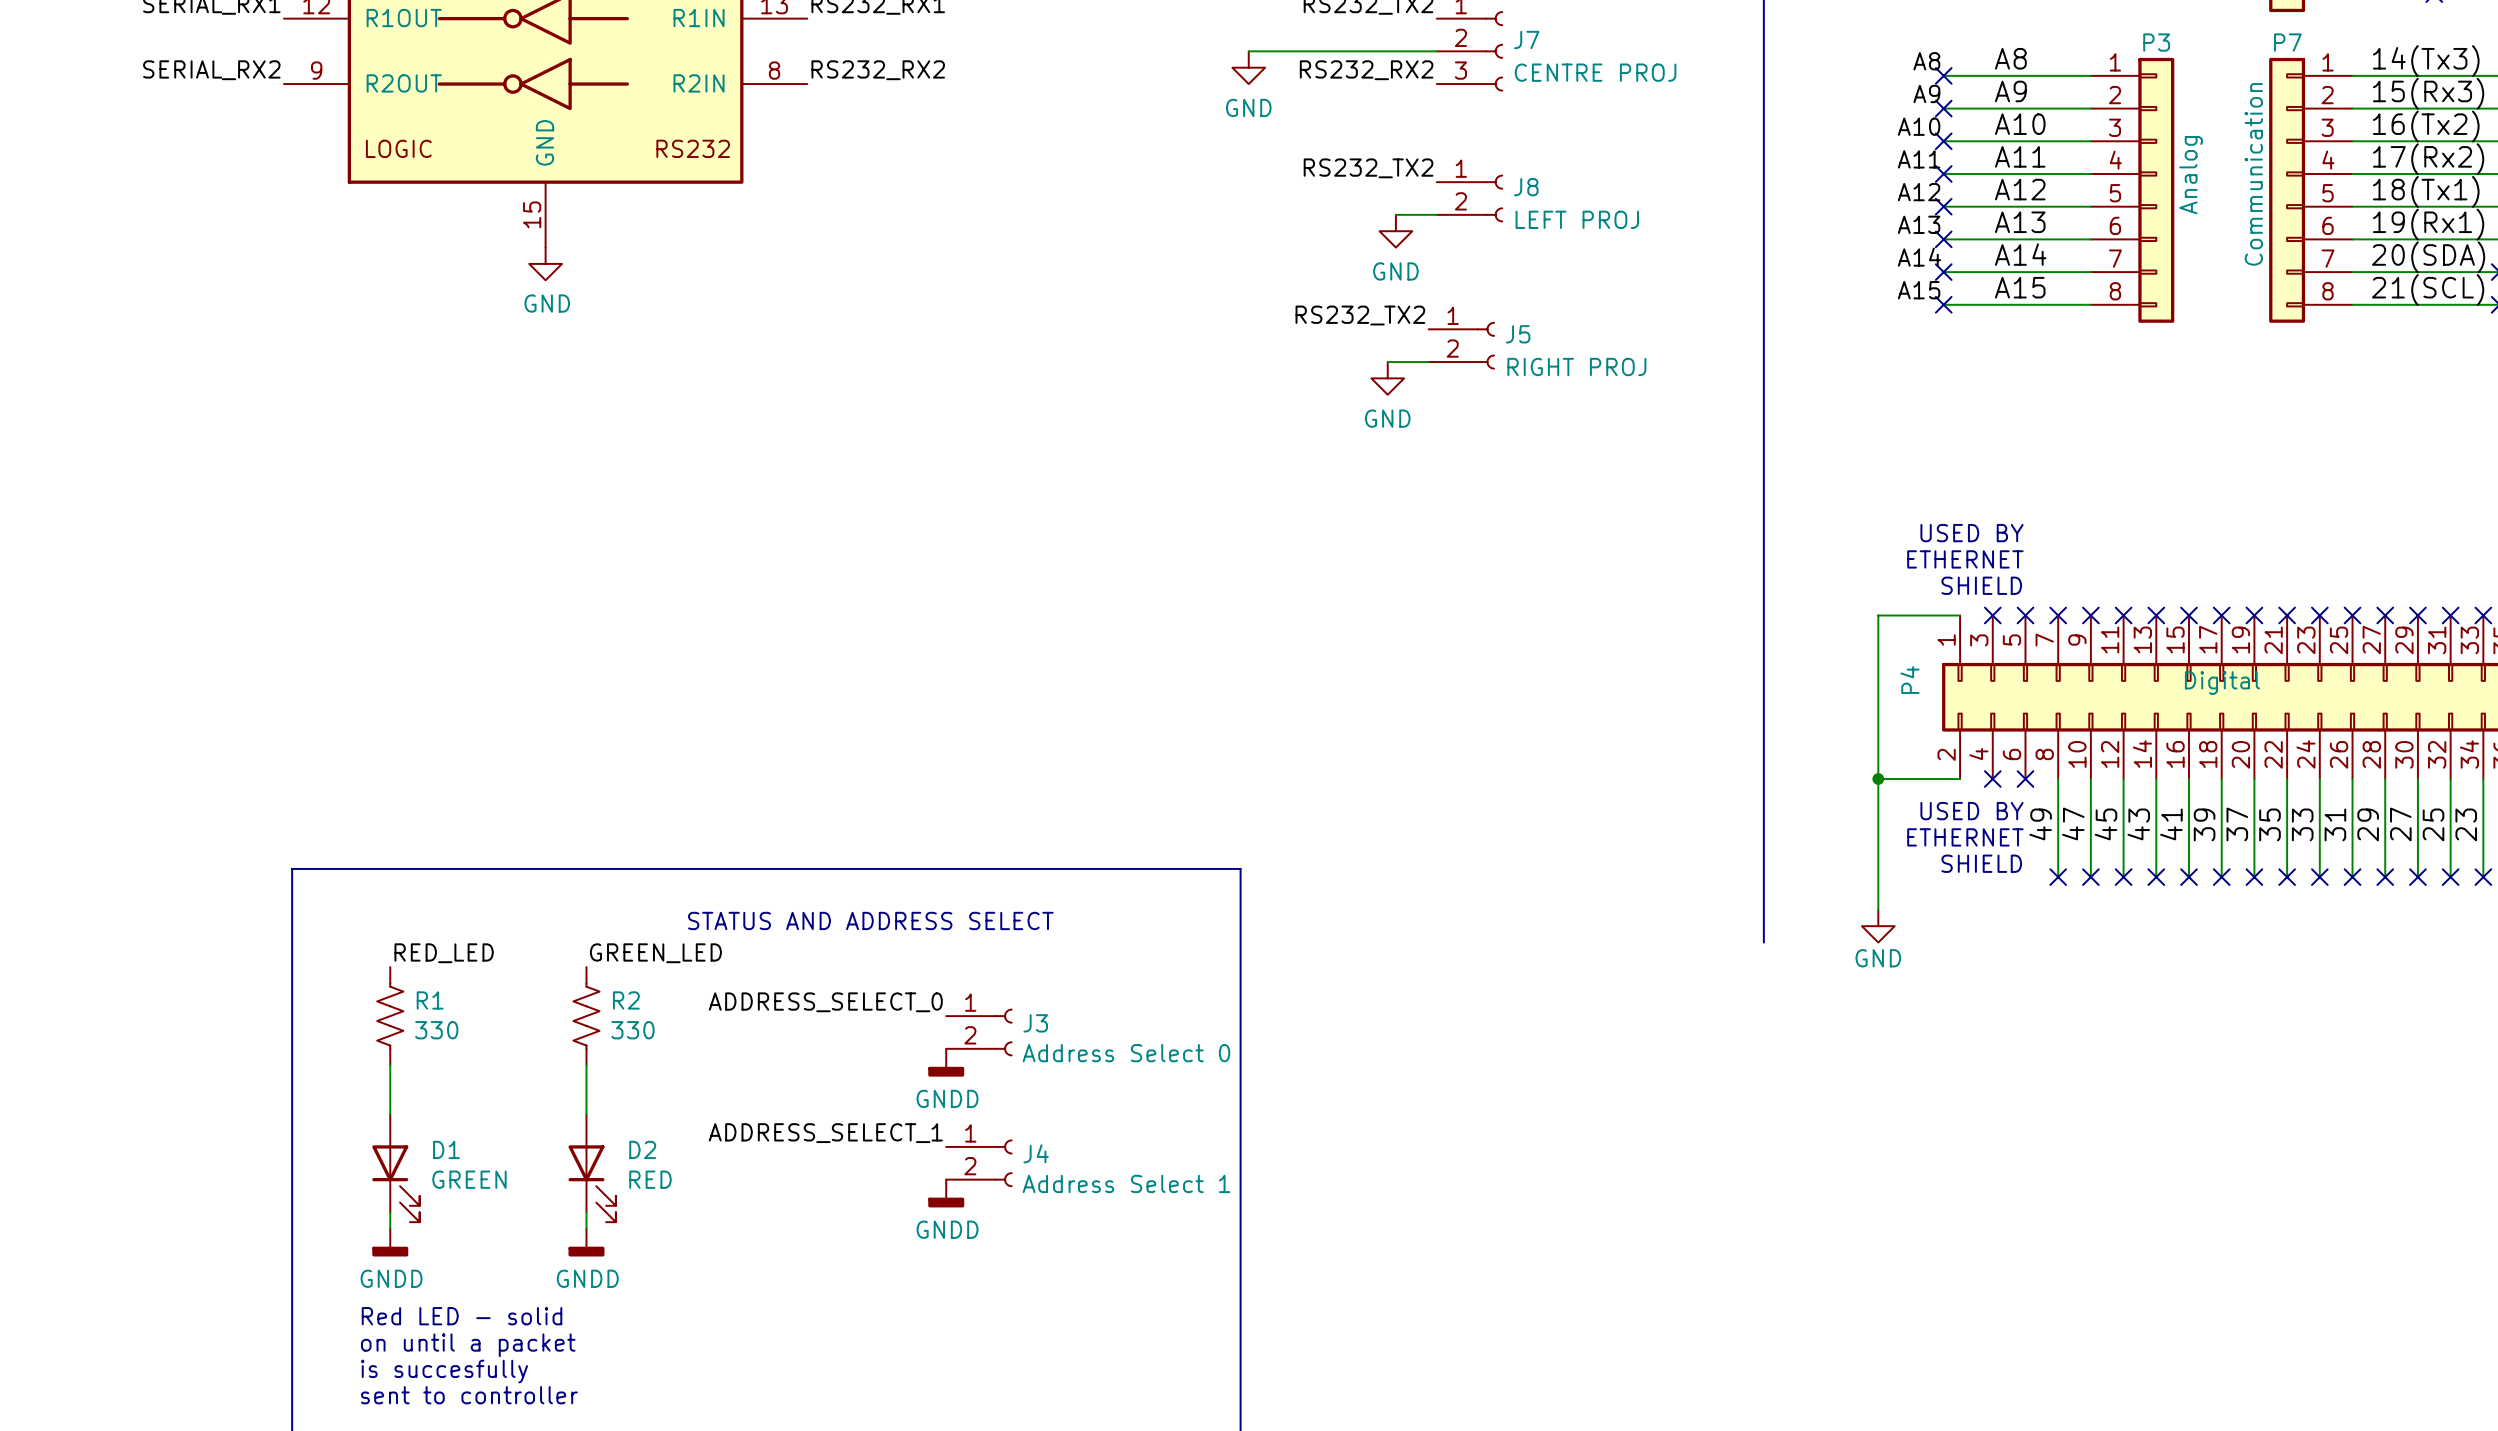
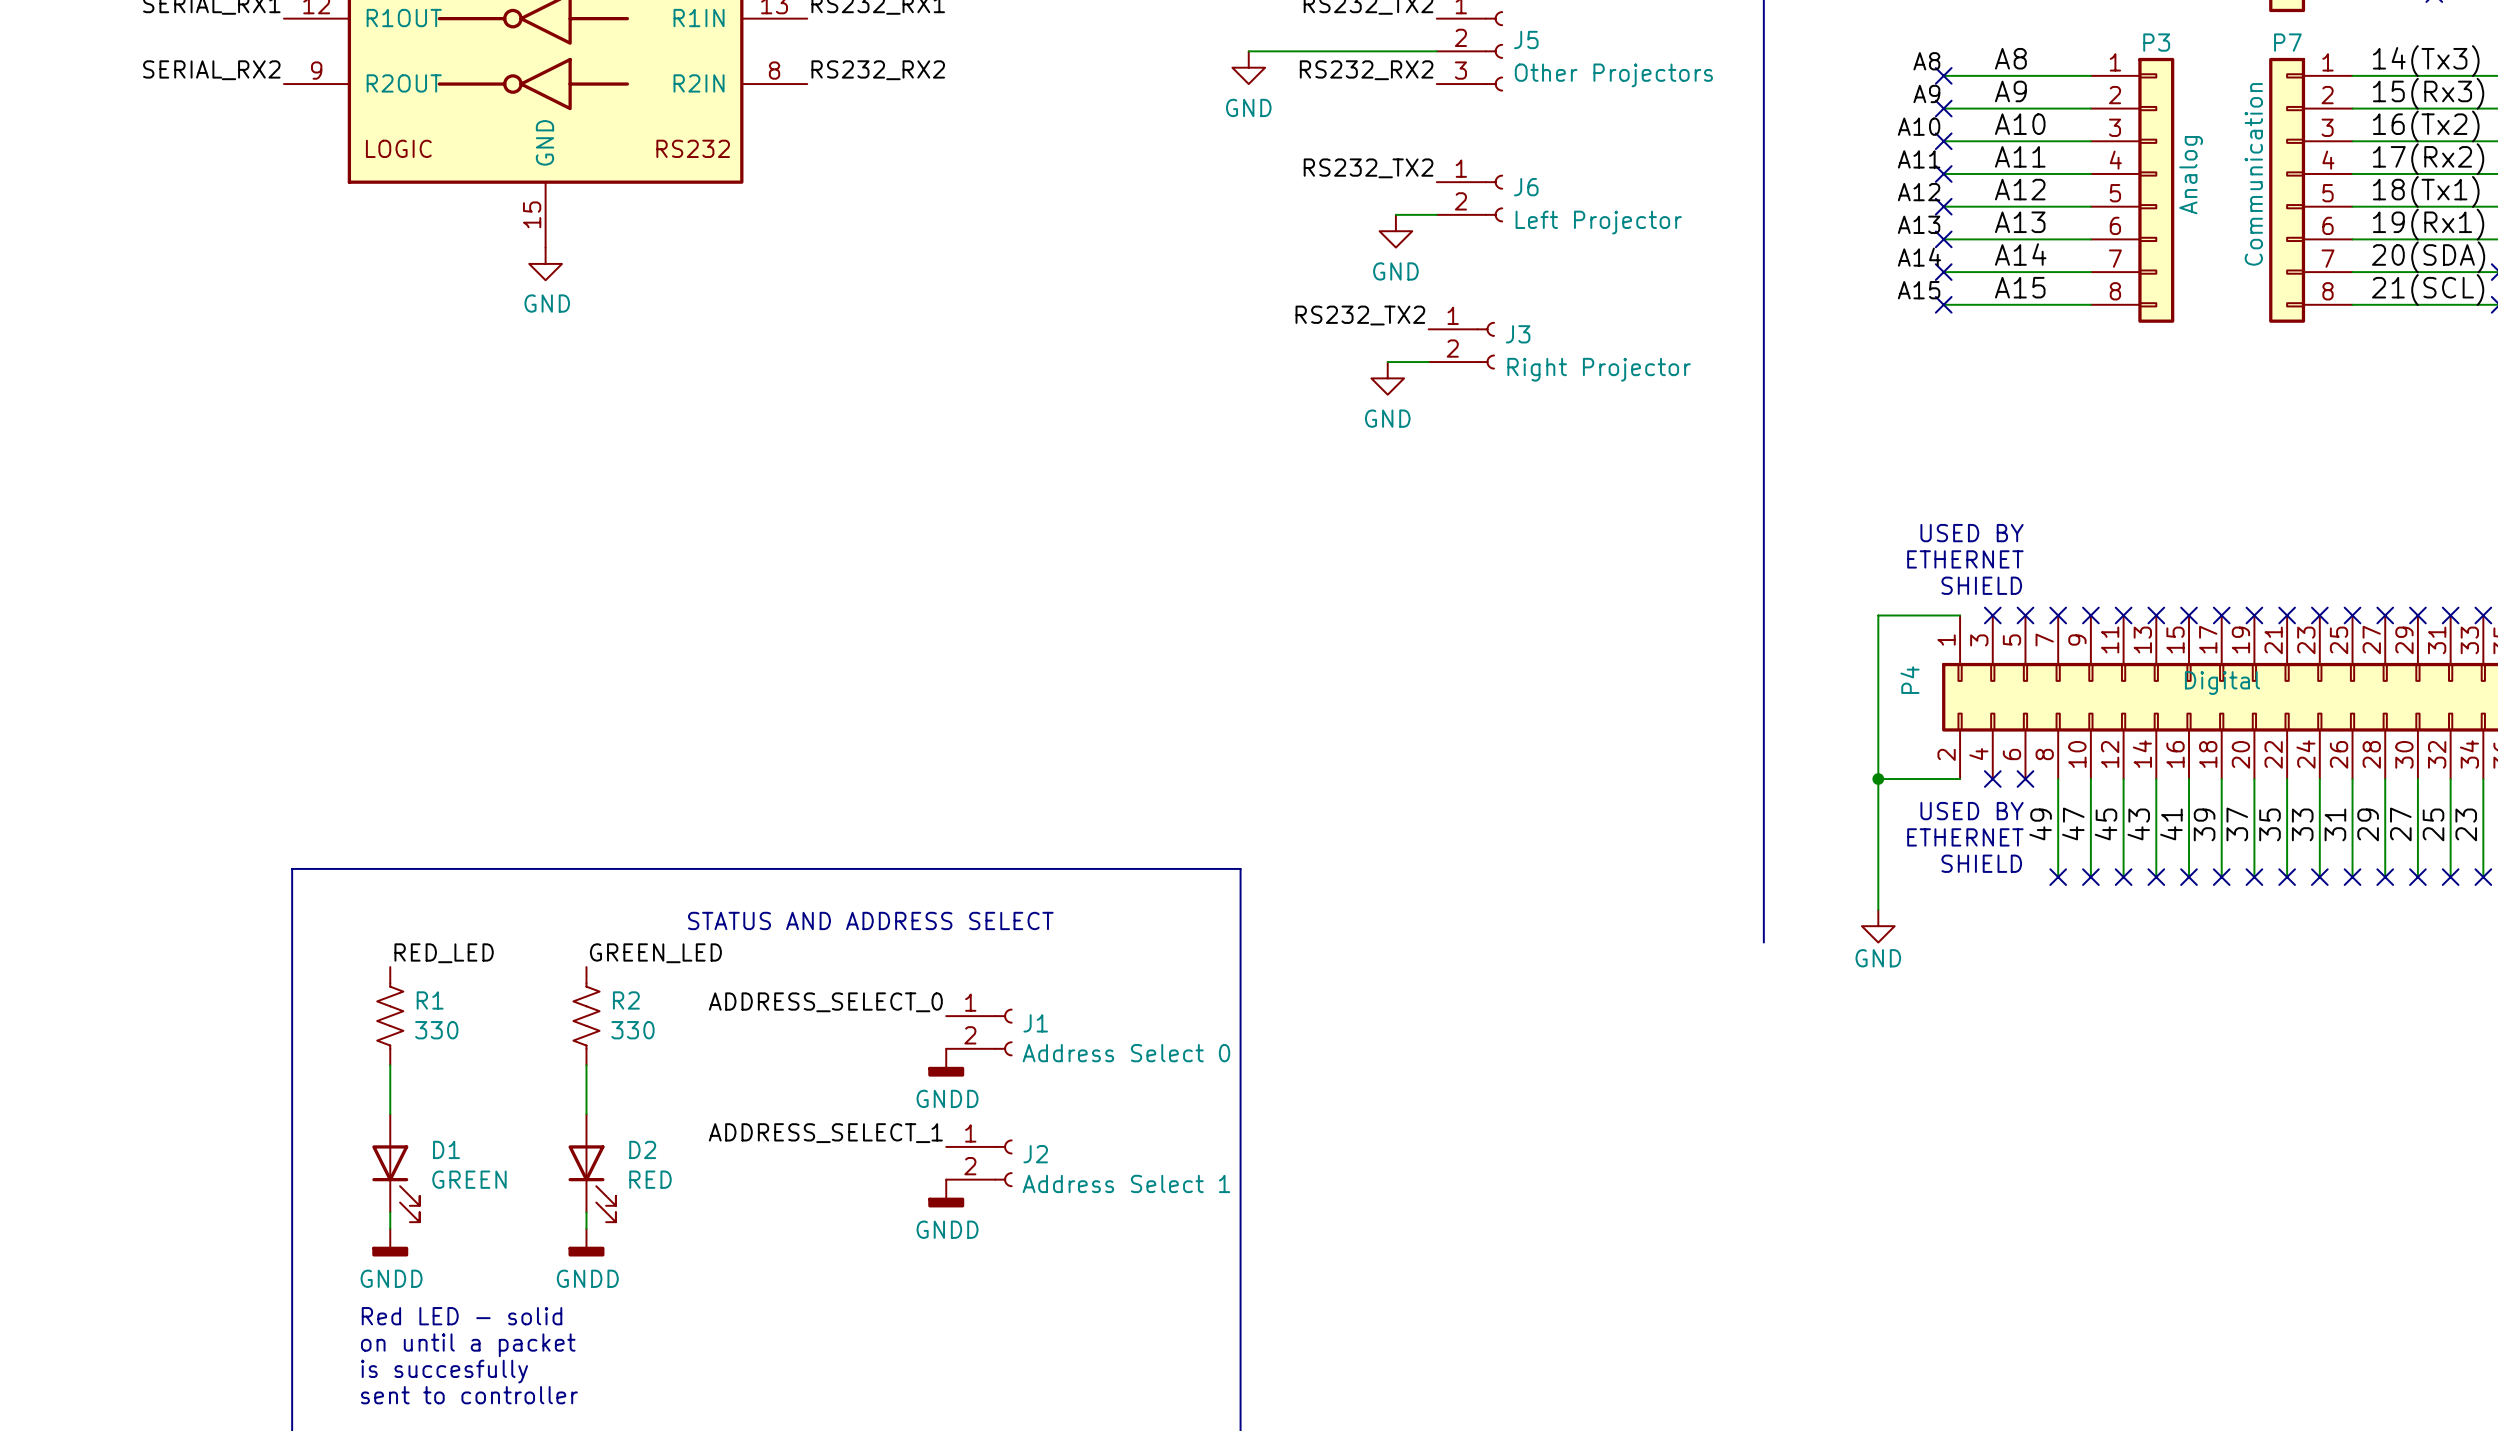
J7 name: J7 (1526, 39) -> J5 (1526, 39)
J7 value: CENTRE PROJ (1595, 72) -> Other Projectors (1613, 75)
J8 name: J8 (1526, 187) -> J6 (1526, 187)
J8 value: LEFT PROJ (1577, 219) -> Left Projector (1598, 222)
J5 name: J5 (1518, 334) -> J3 (1518, 334)
J5 value: RIGHT PROJ (1576, 366) -> Right Projector (1599, 369)
J3 name: J3 (1035, 1023) -> J1 (1035, 1023)
J4 name: J4 (1036, 1153) -> J2 (1035, 1154)

